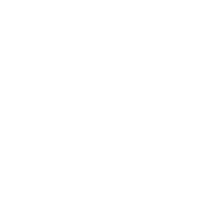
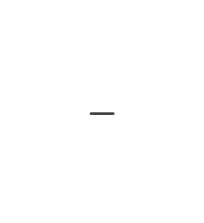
text: none -> - (102, 113)

